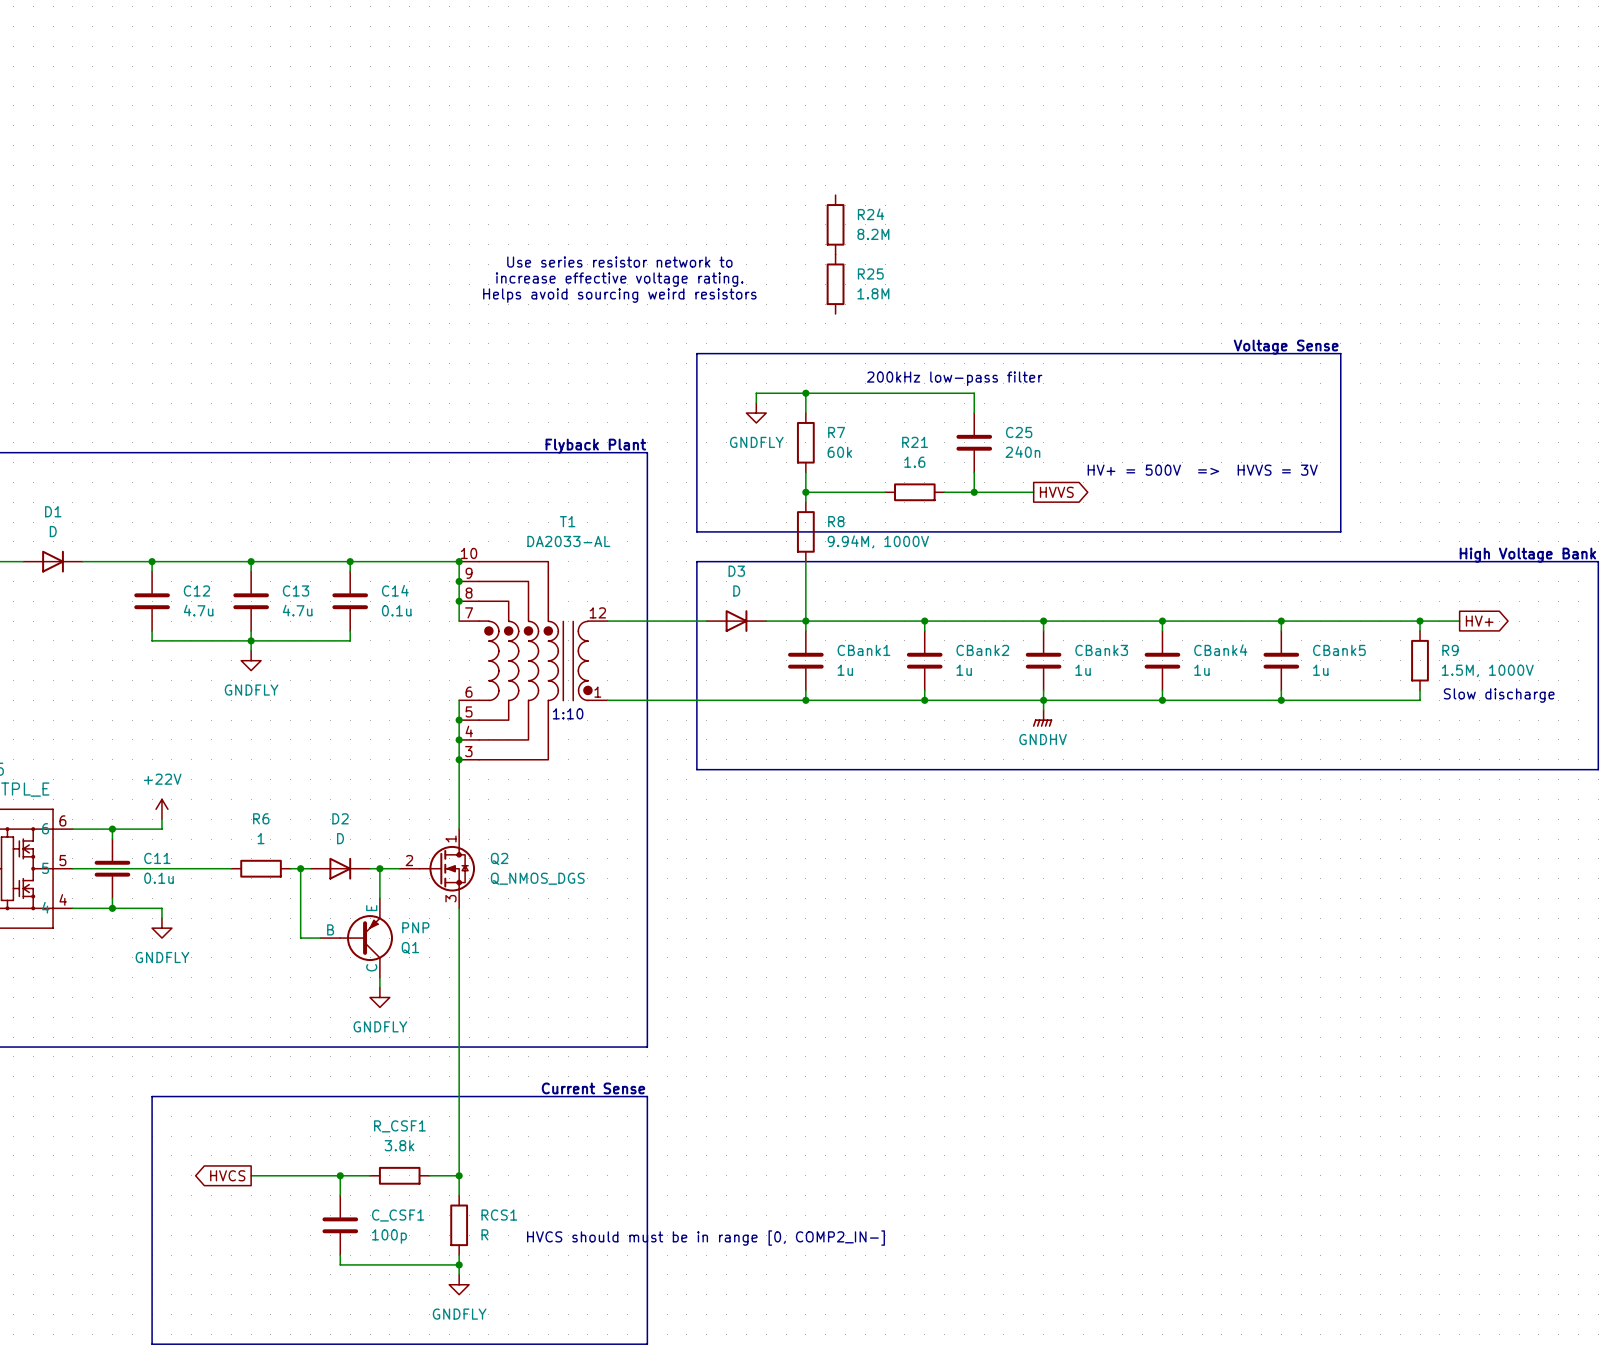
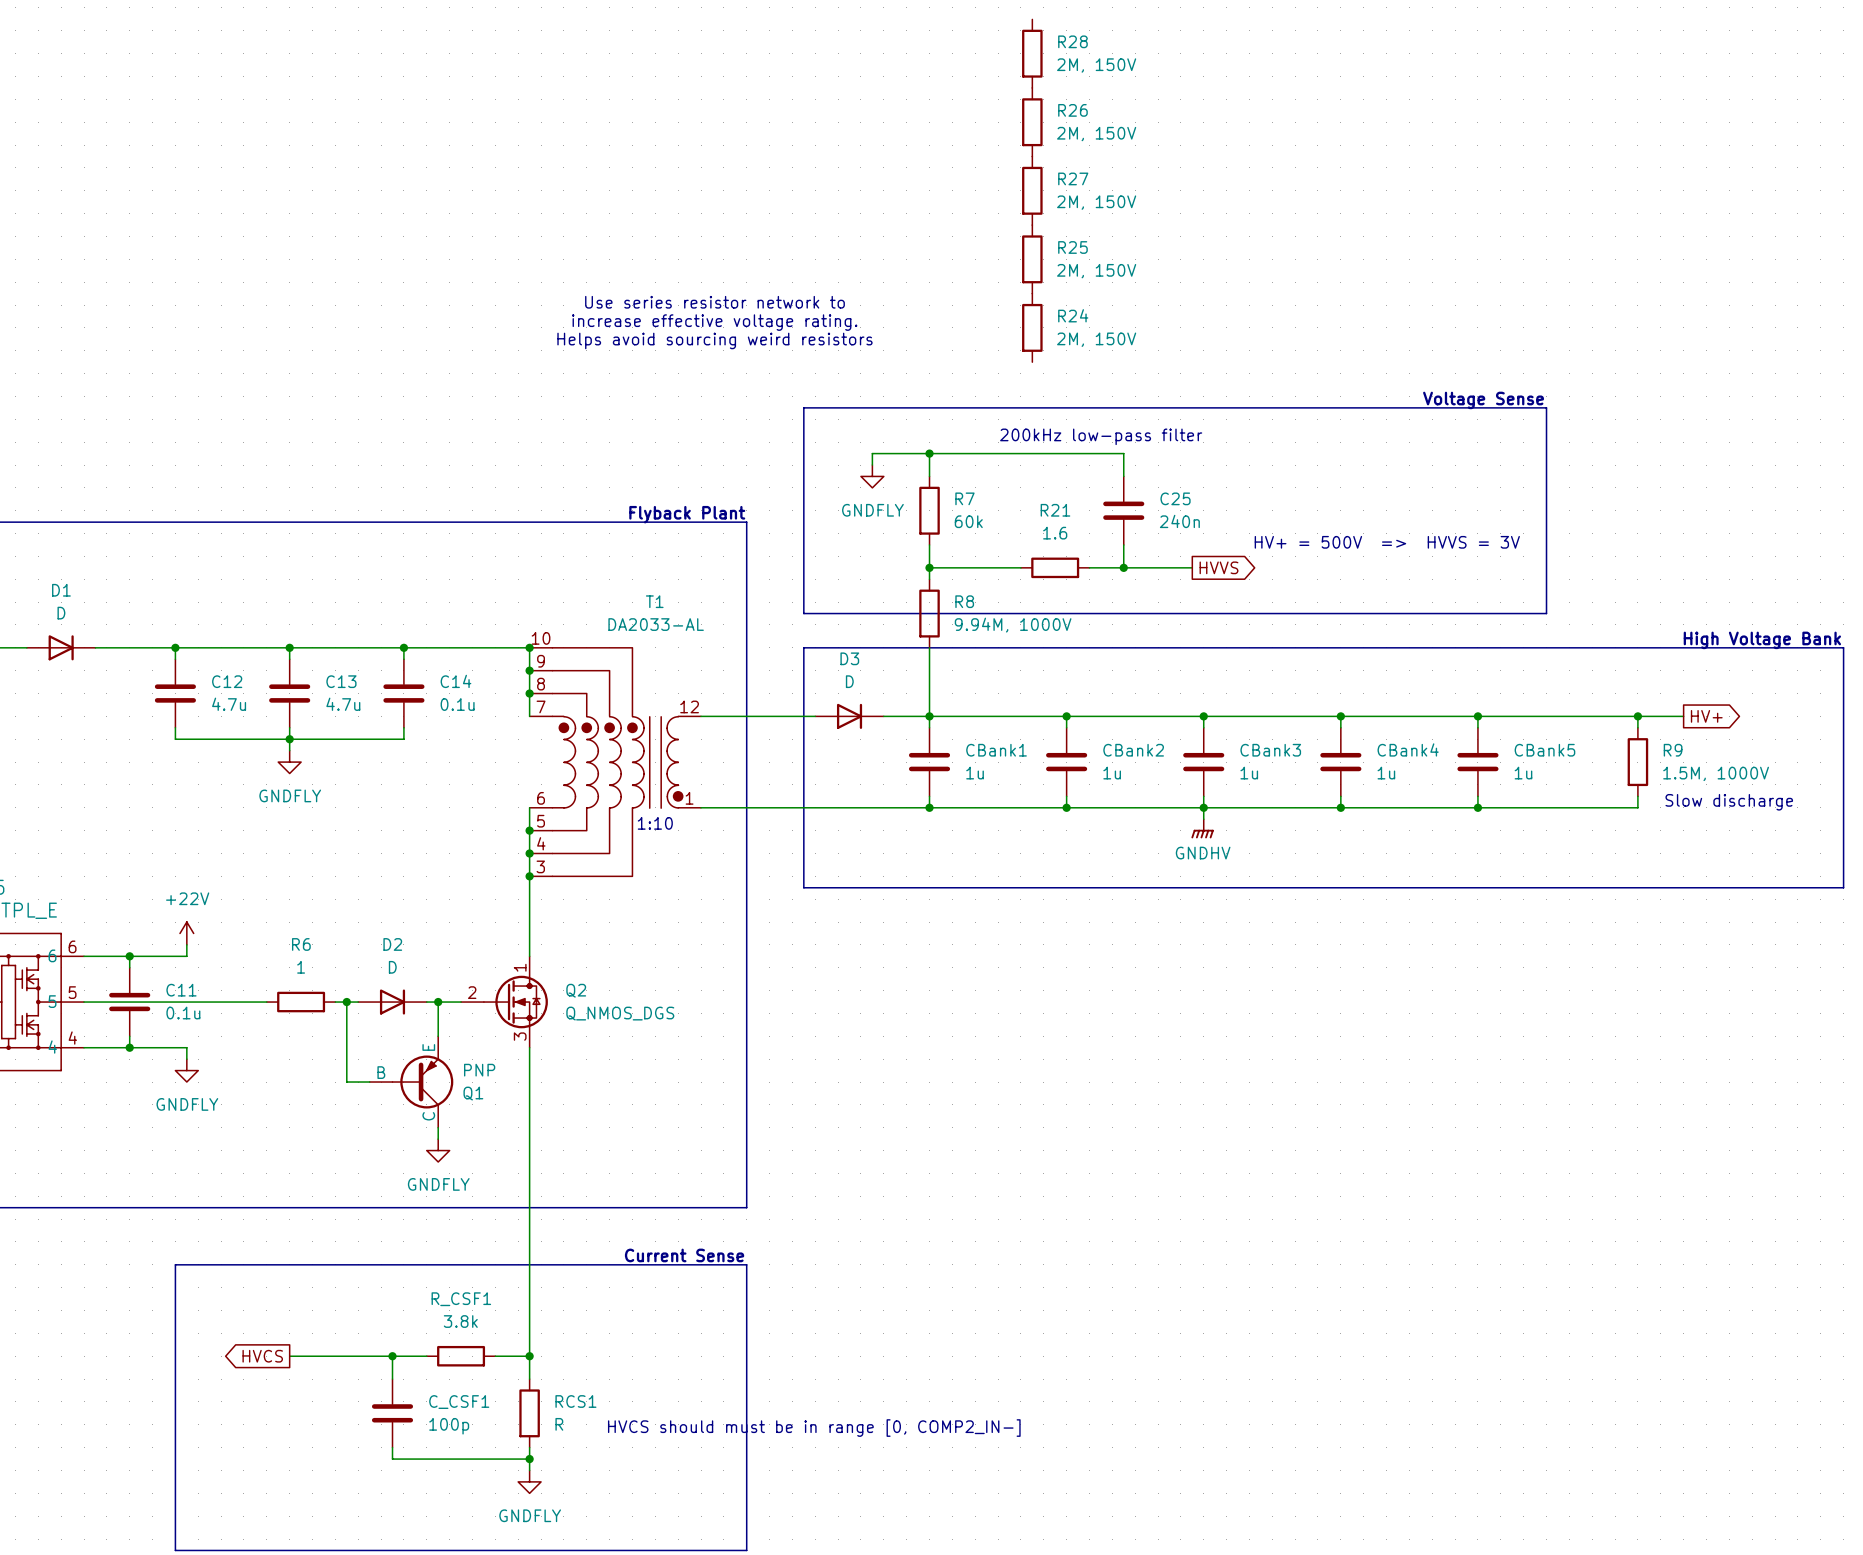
R28: none -> 2M, 150V (1032, 53)
R26: none -> 2M, 150V (1032, 122)
R27: none -> 2M, 150V (1032, 190)
R24 position: (835, 224) -> (1032, 327)
R24 value: 8.2M (873, 234) -> 2M, 150V (1096, 339)
R25 position: (835, 284) -> (1032, 259)
R25 value: 1.8M (873, 293) -> 2M, 150V (1096, 271)

